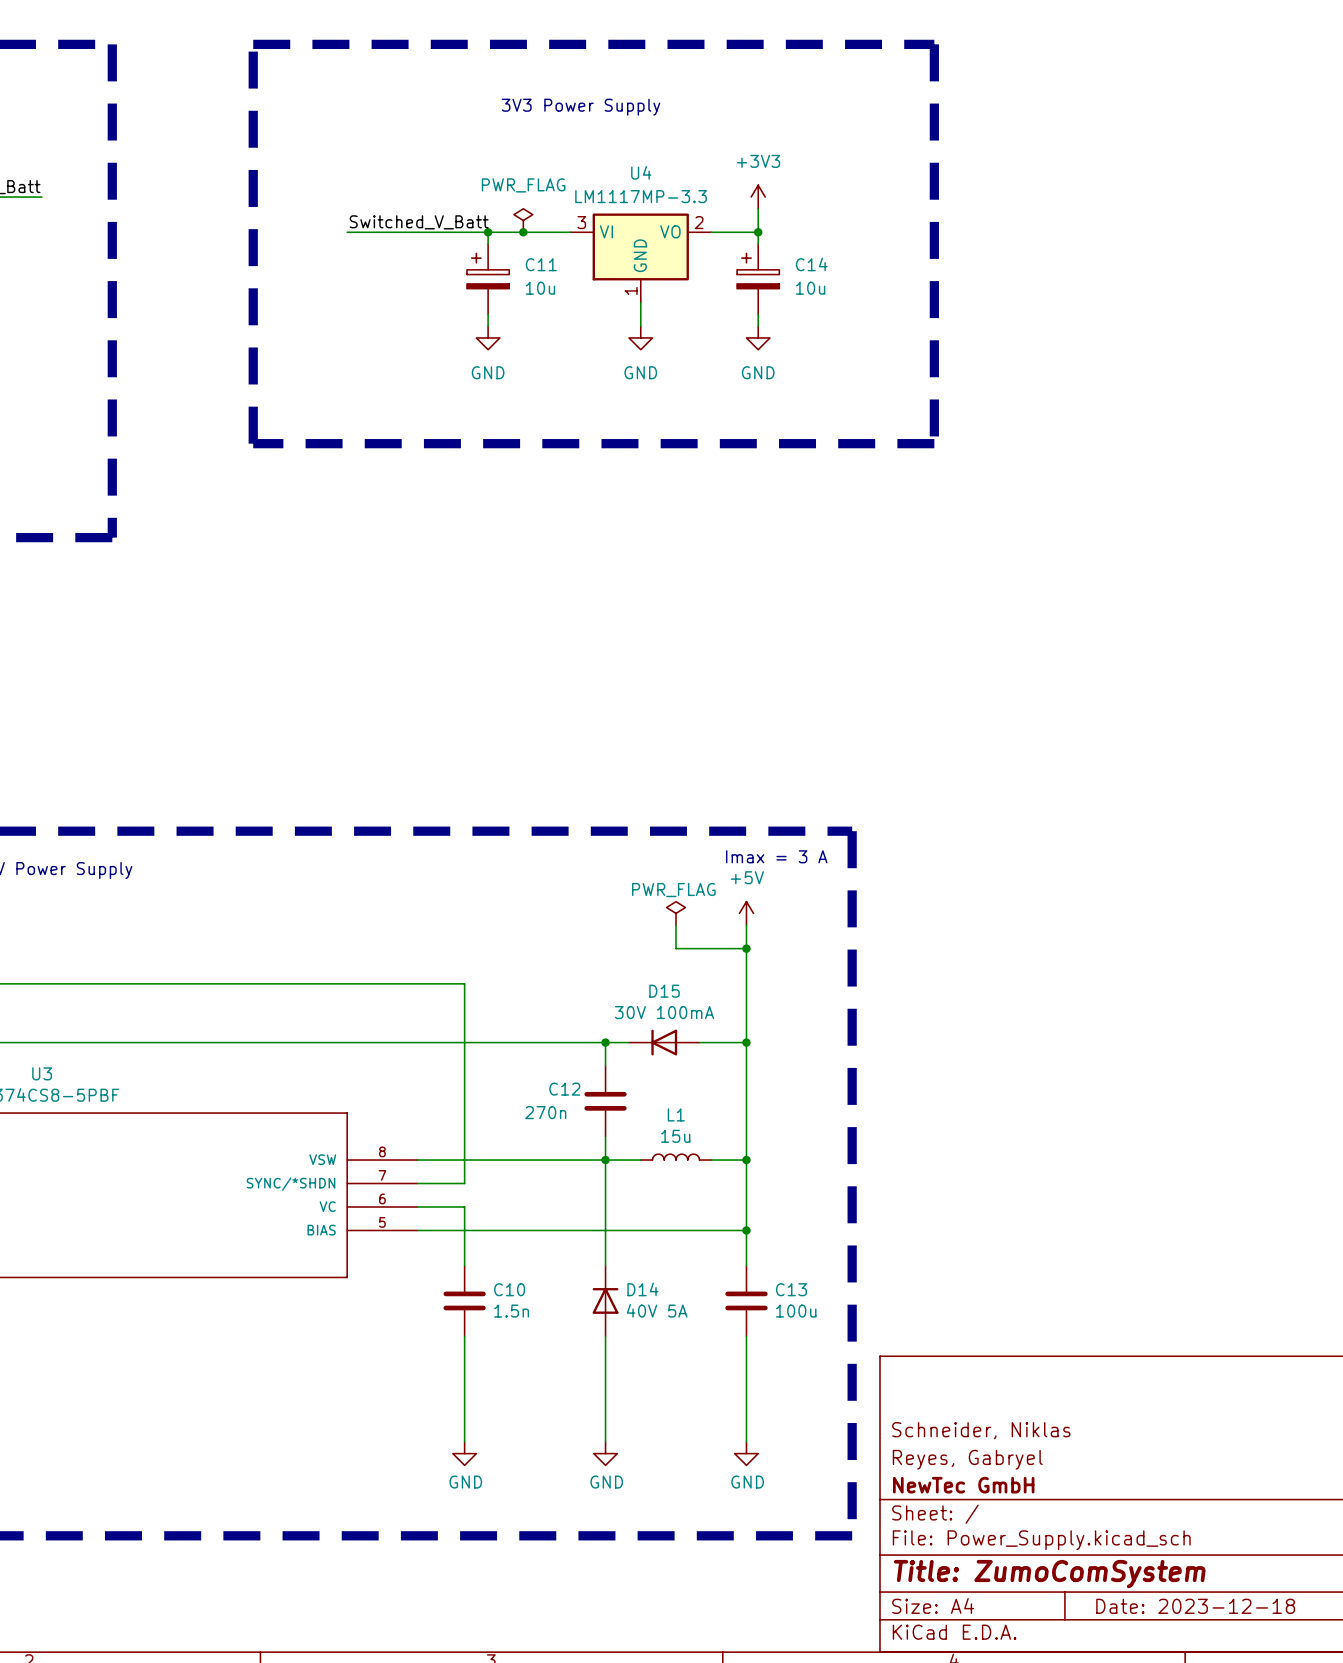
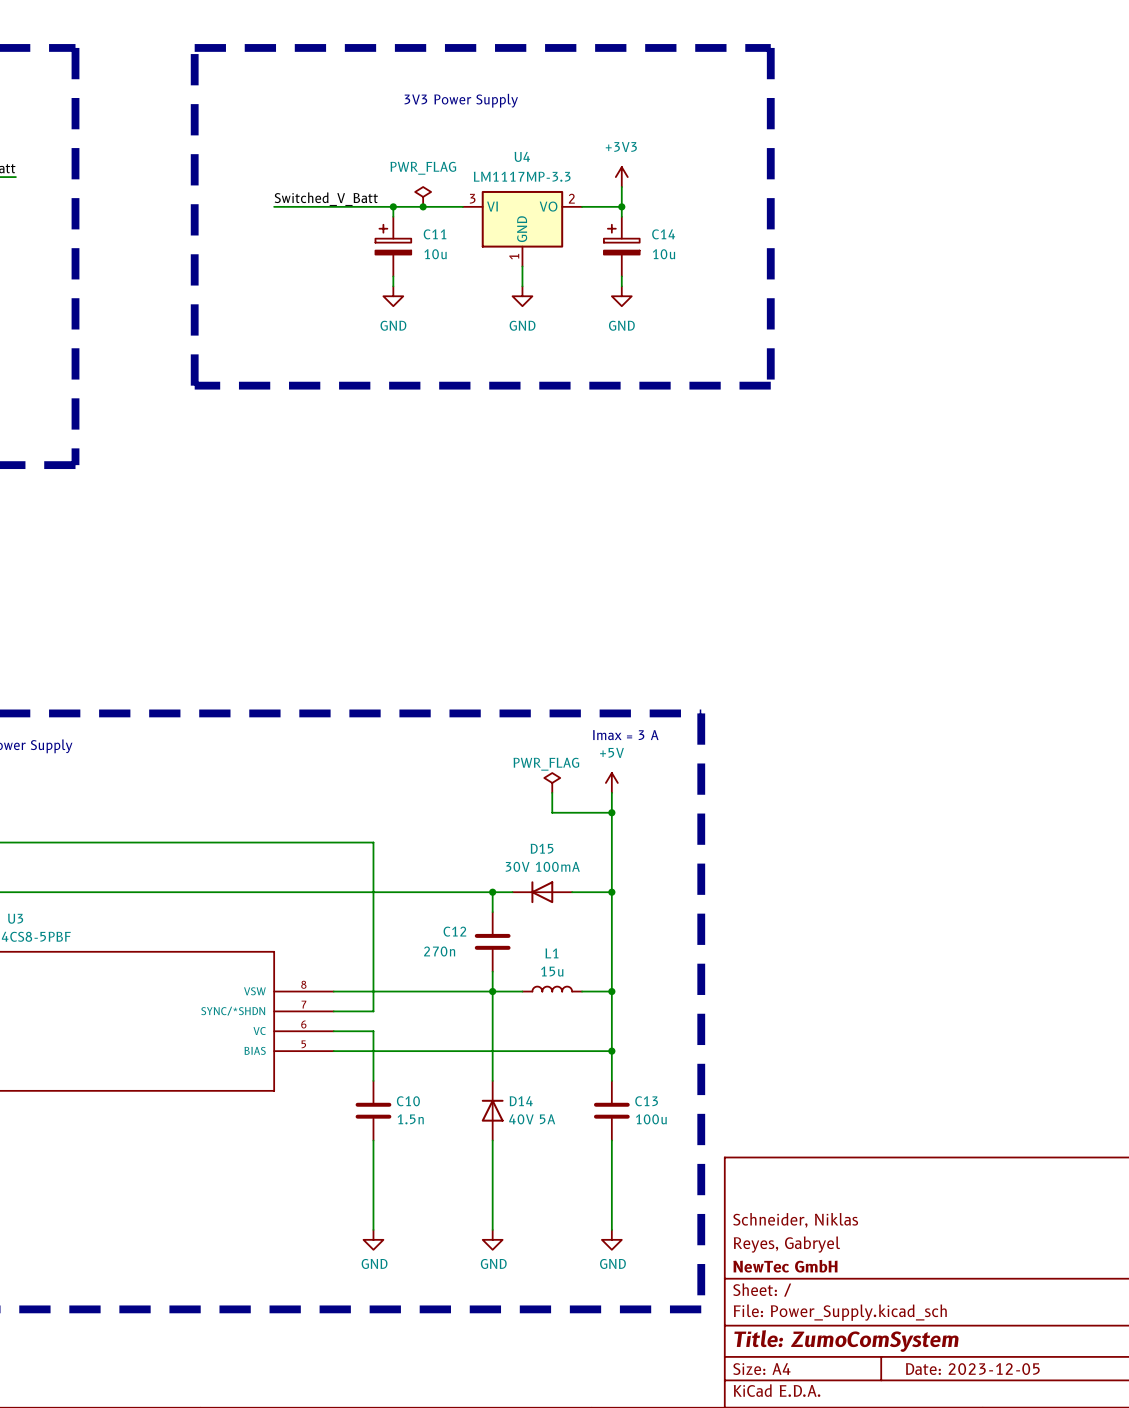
title block: Date: 2023-12-18 (1195, 1606) -> Date: 2023-12-05 (972, 1369)

